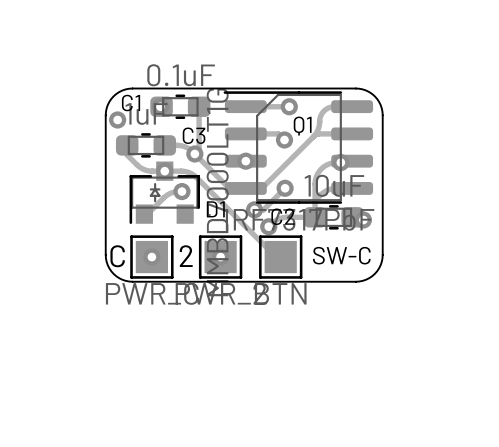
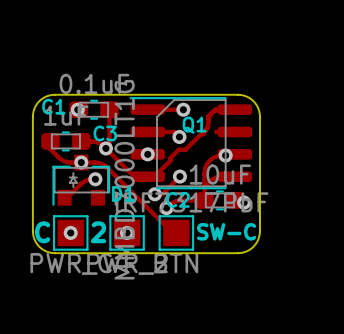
via: (117, 119) -> none
track: (329, 133) (315, 135) (261, 188) (253, 188) -> (220, 109) (215, 109) (208, 116) (208, 127) (185, 149) (178, 149) (154, 176)

